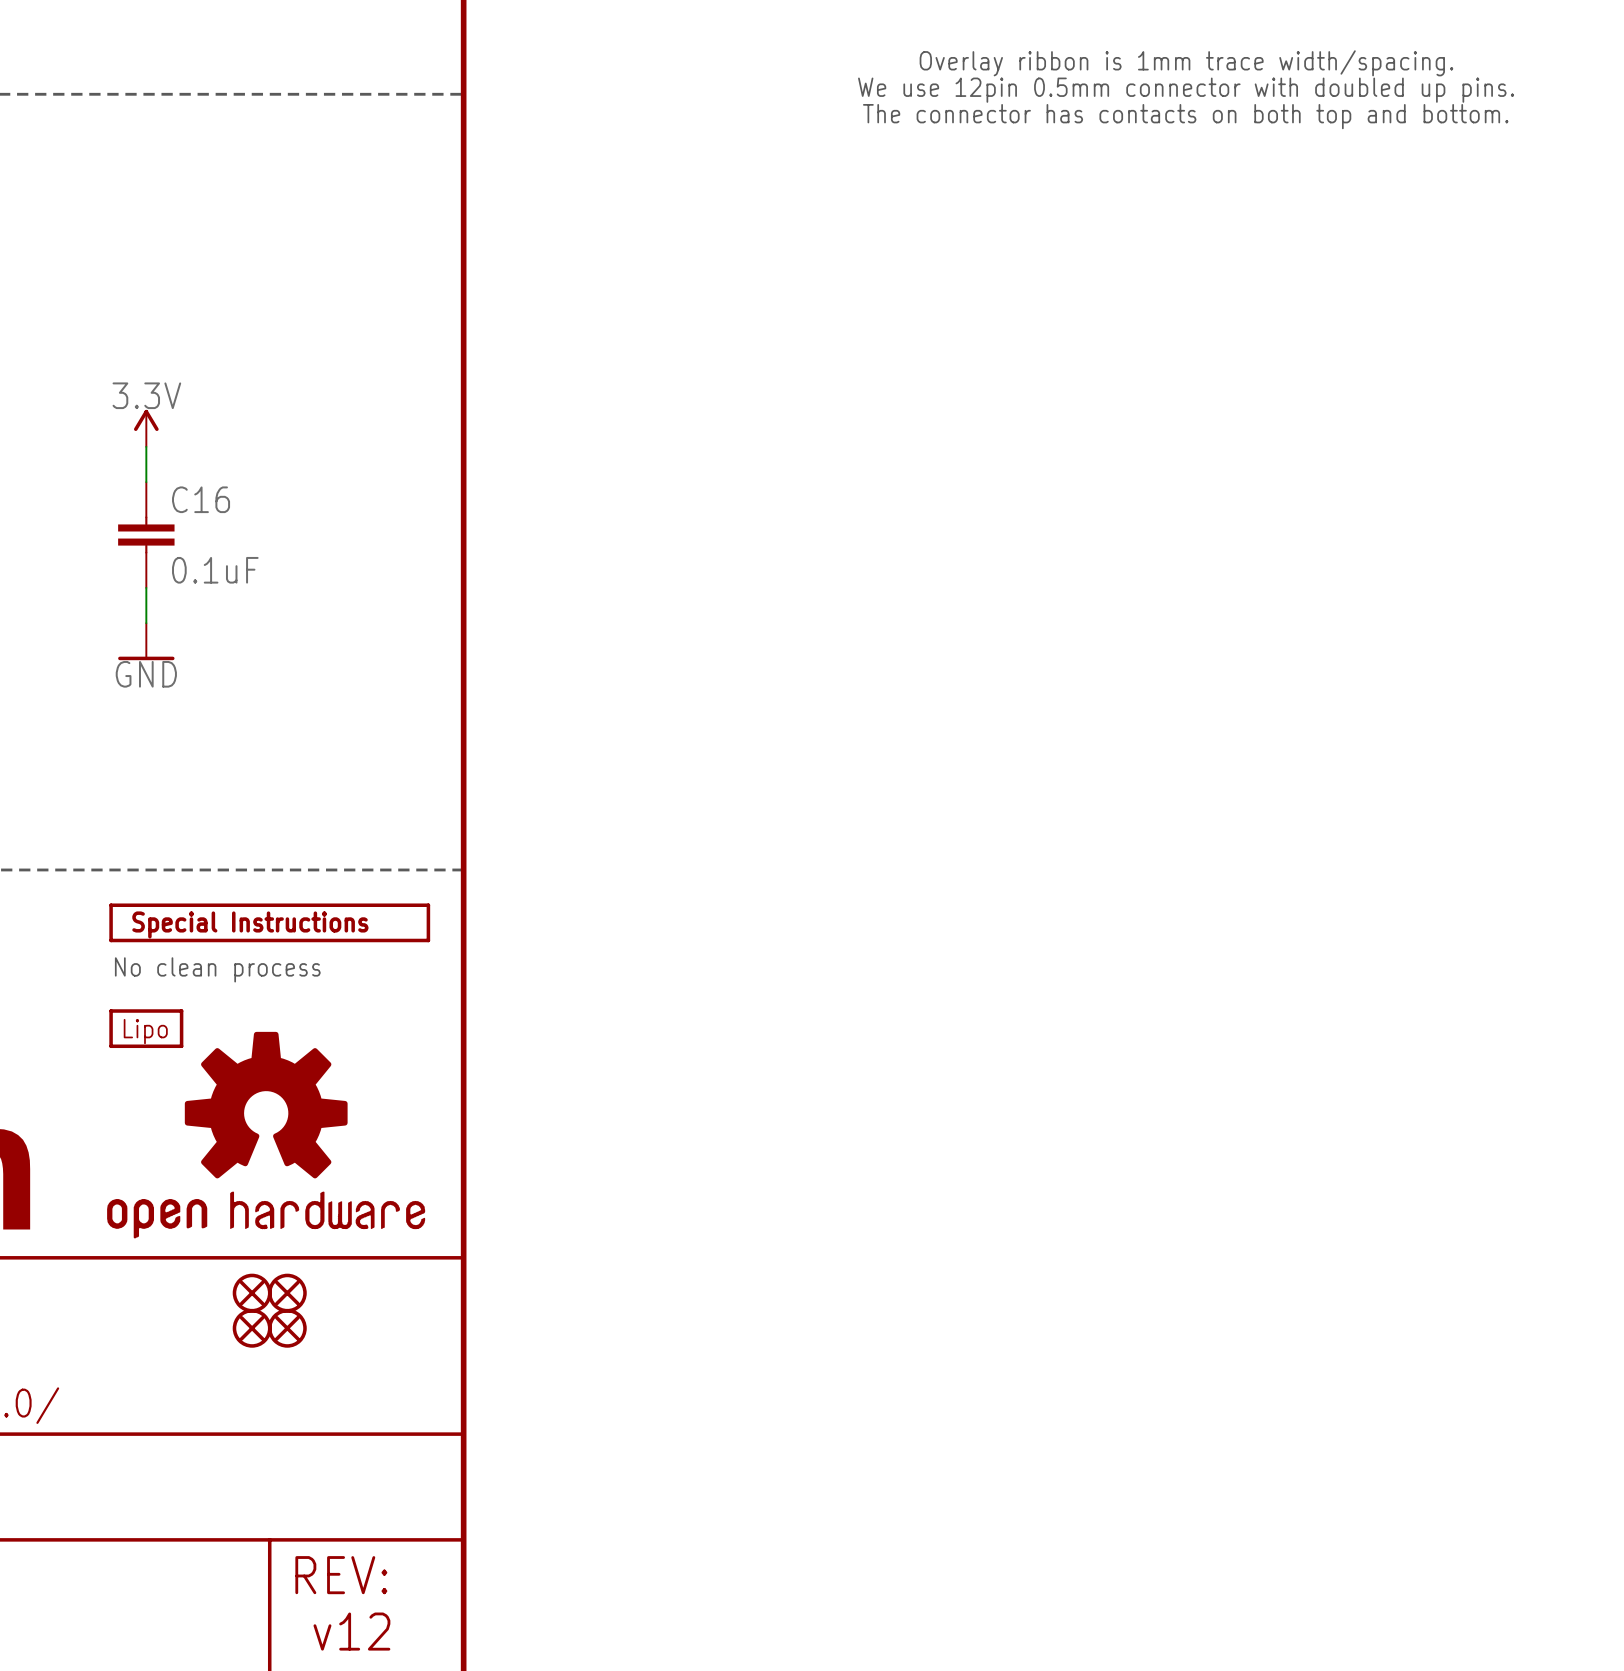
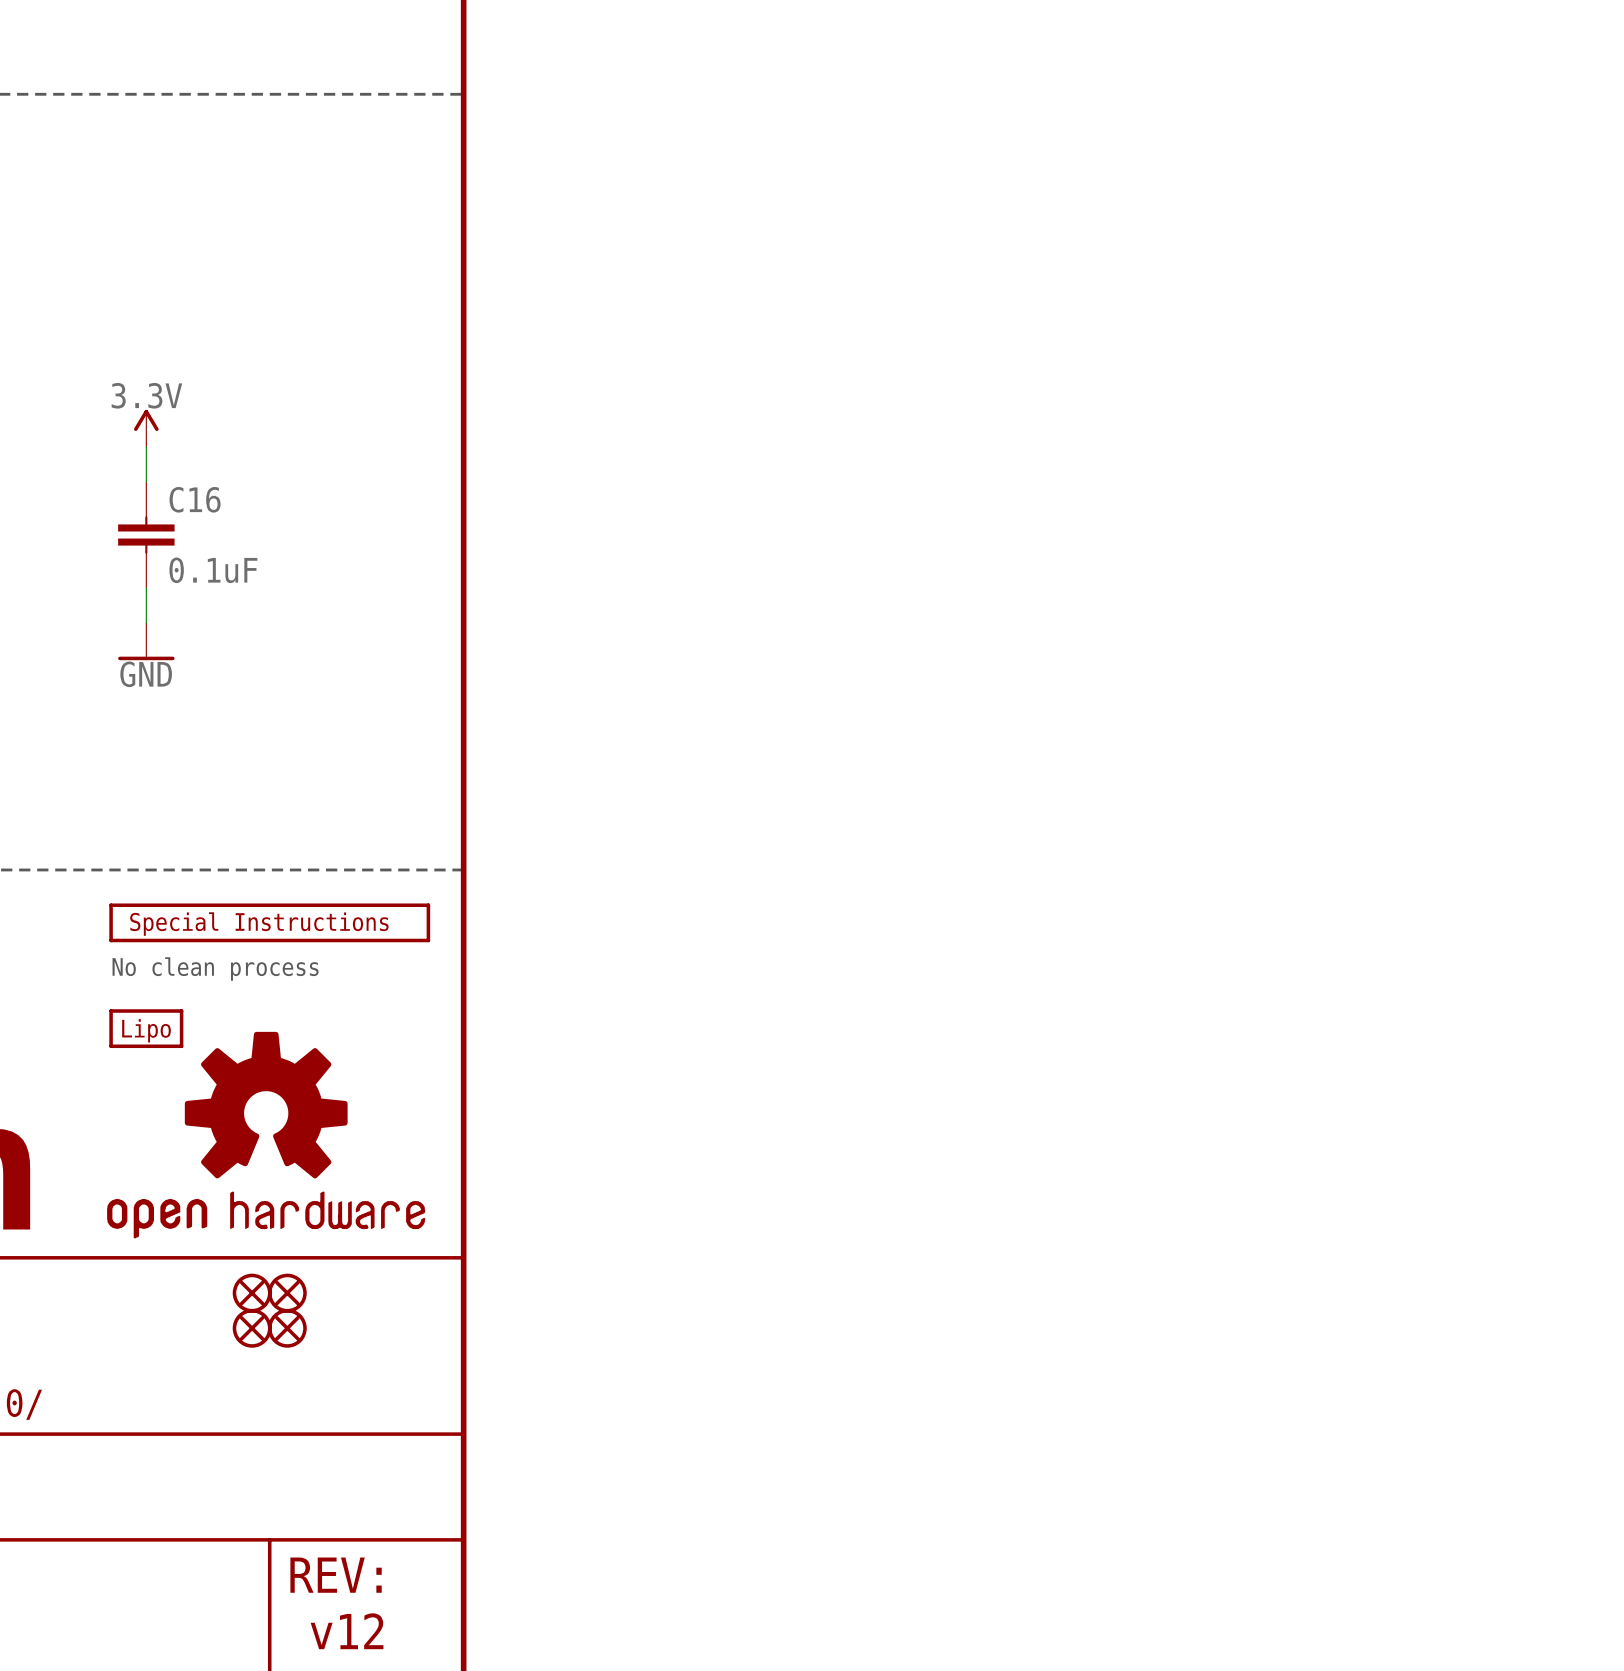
text: Overlay ribbon is 1mm trace width/spacing. (1186, 63) -> none
text: We use 12pin 0.5mm connector with doubled up pins. (1186, 90) -> none
text: The connector has contacts on both top and bottom. (1185, 116) -> none

